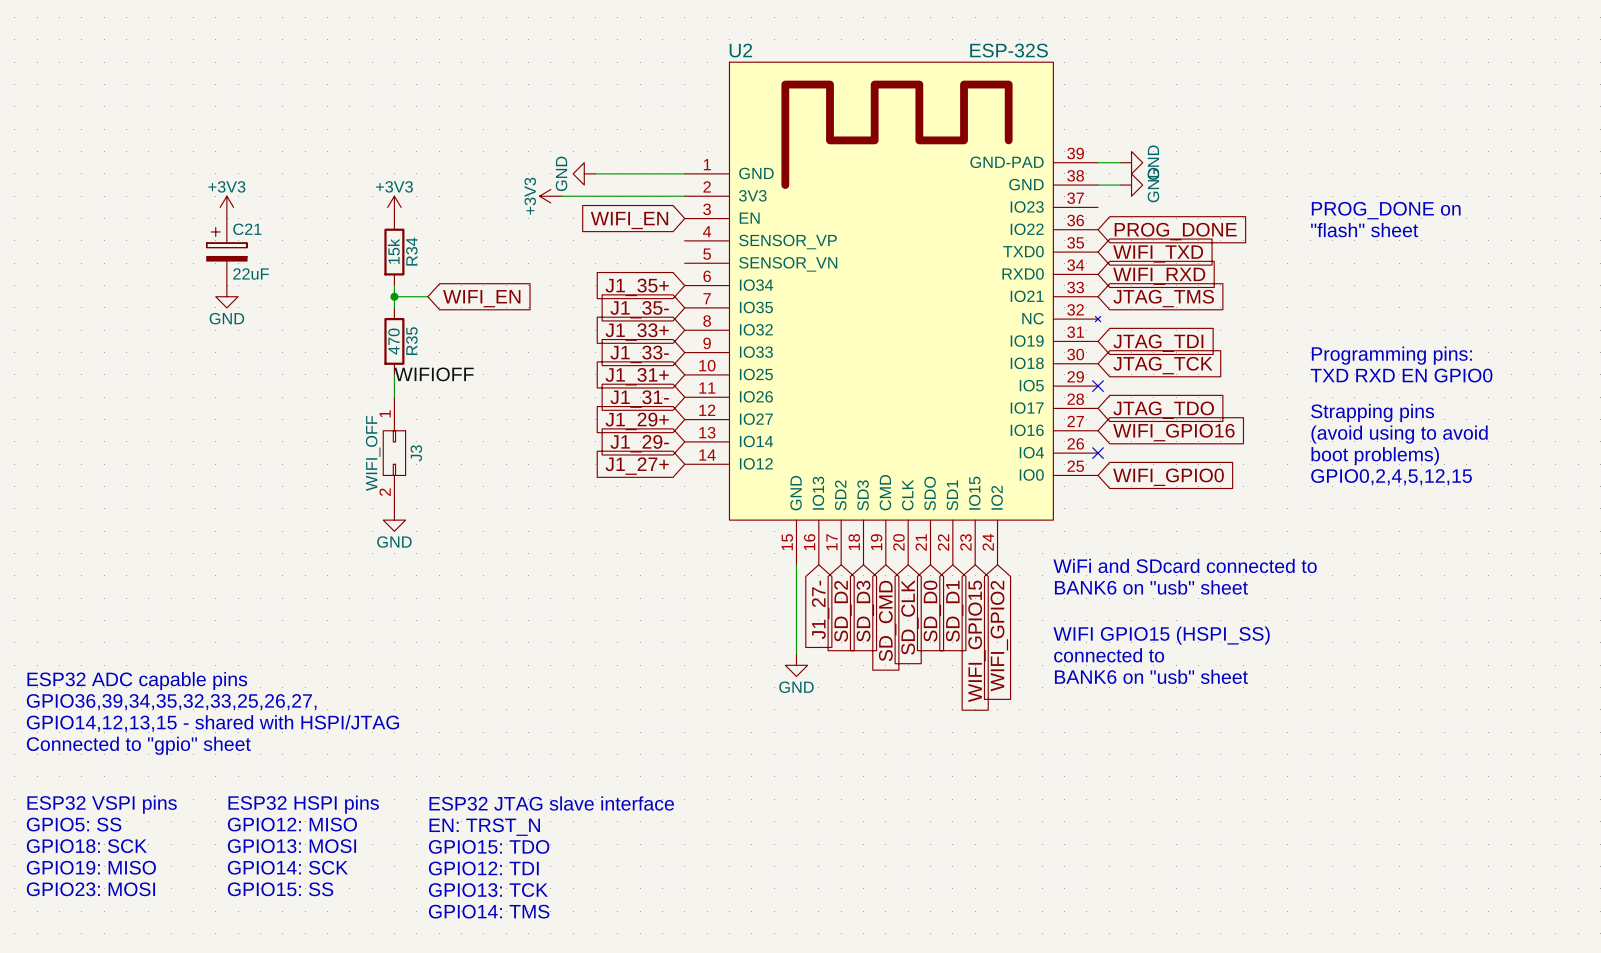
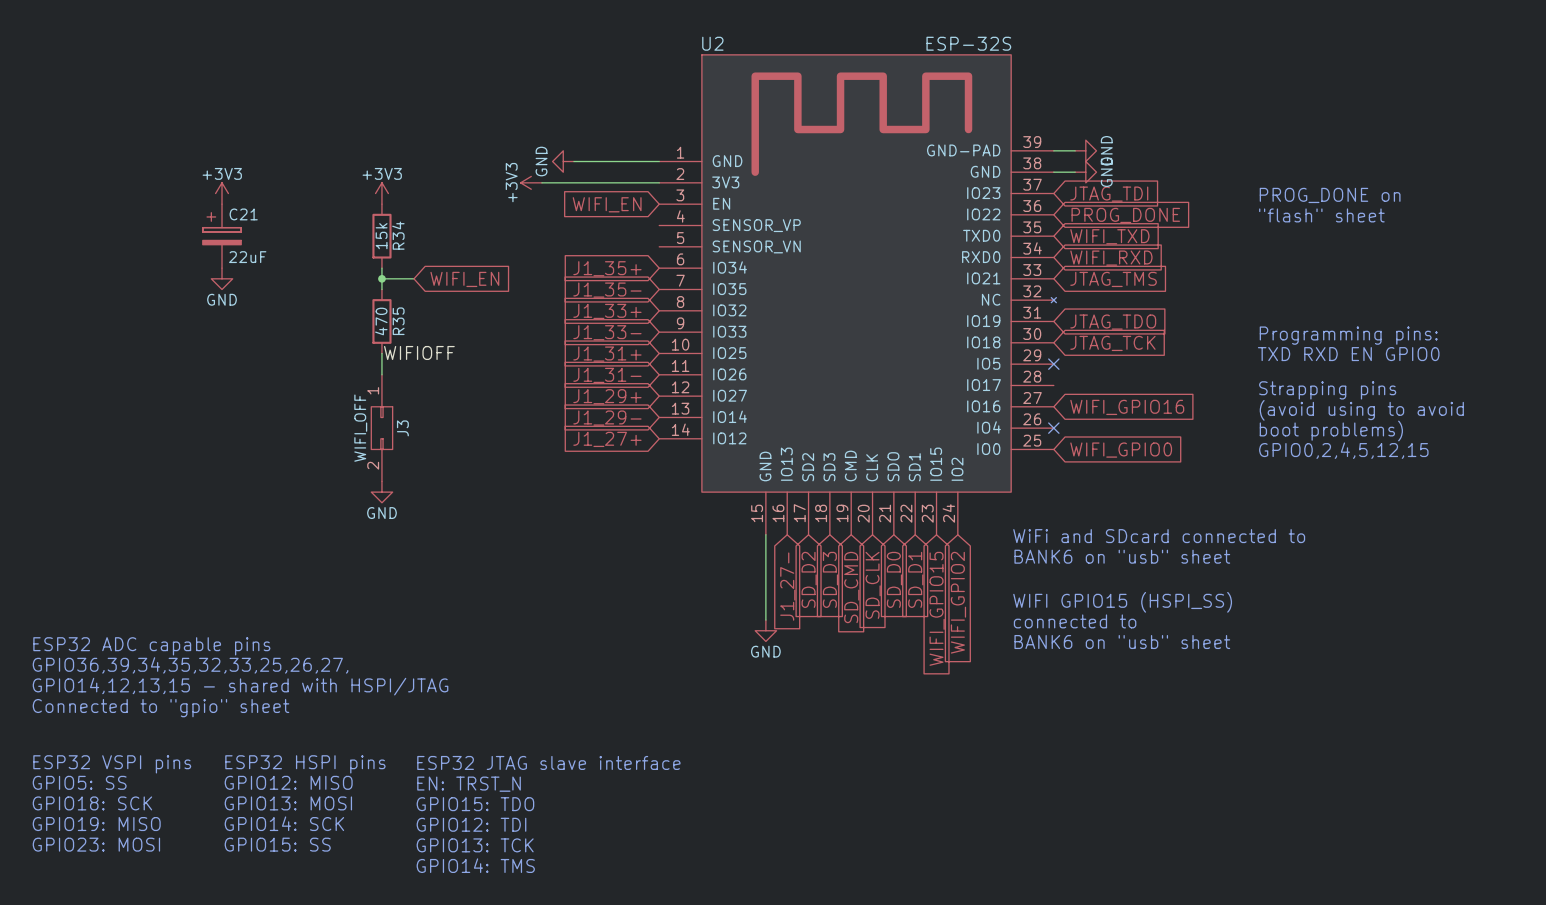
global label: none -> JTAG_TDI (1109, 194)
global label: JTAG_TDI (1158, 343) -> JTAG_TDO (1113, 322)
global label: JTAG_TDO (1163, 410) -> none

